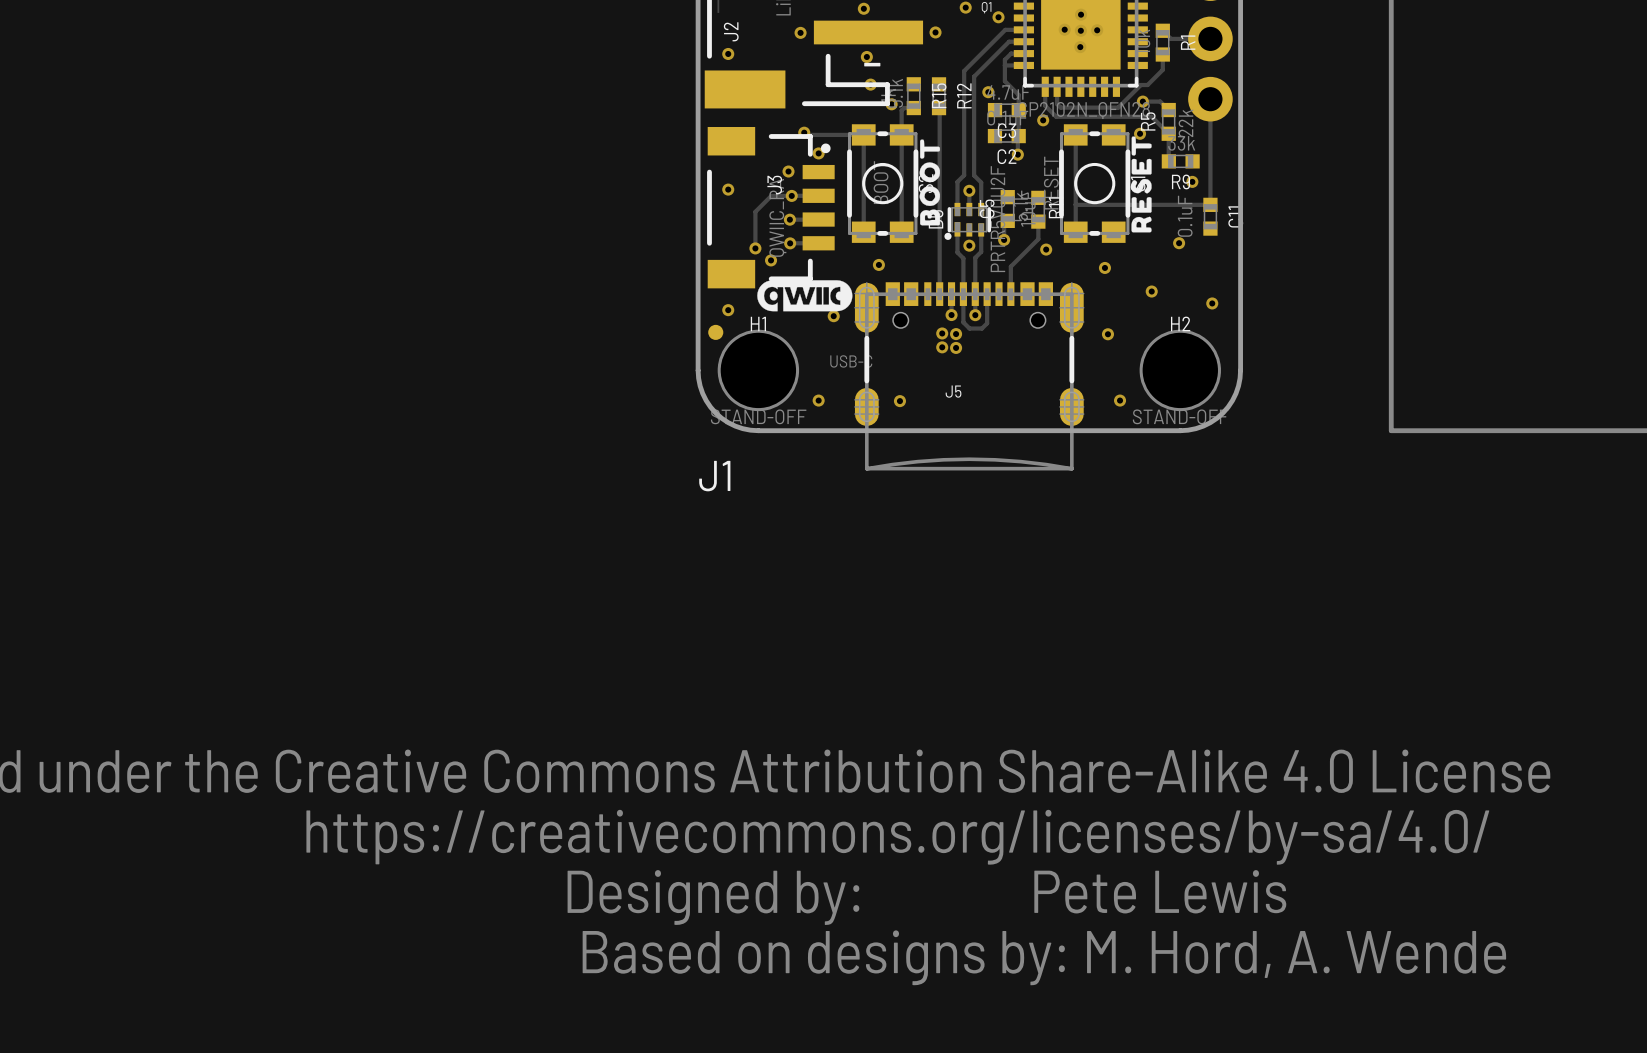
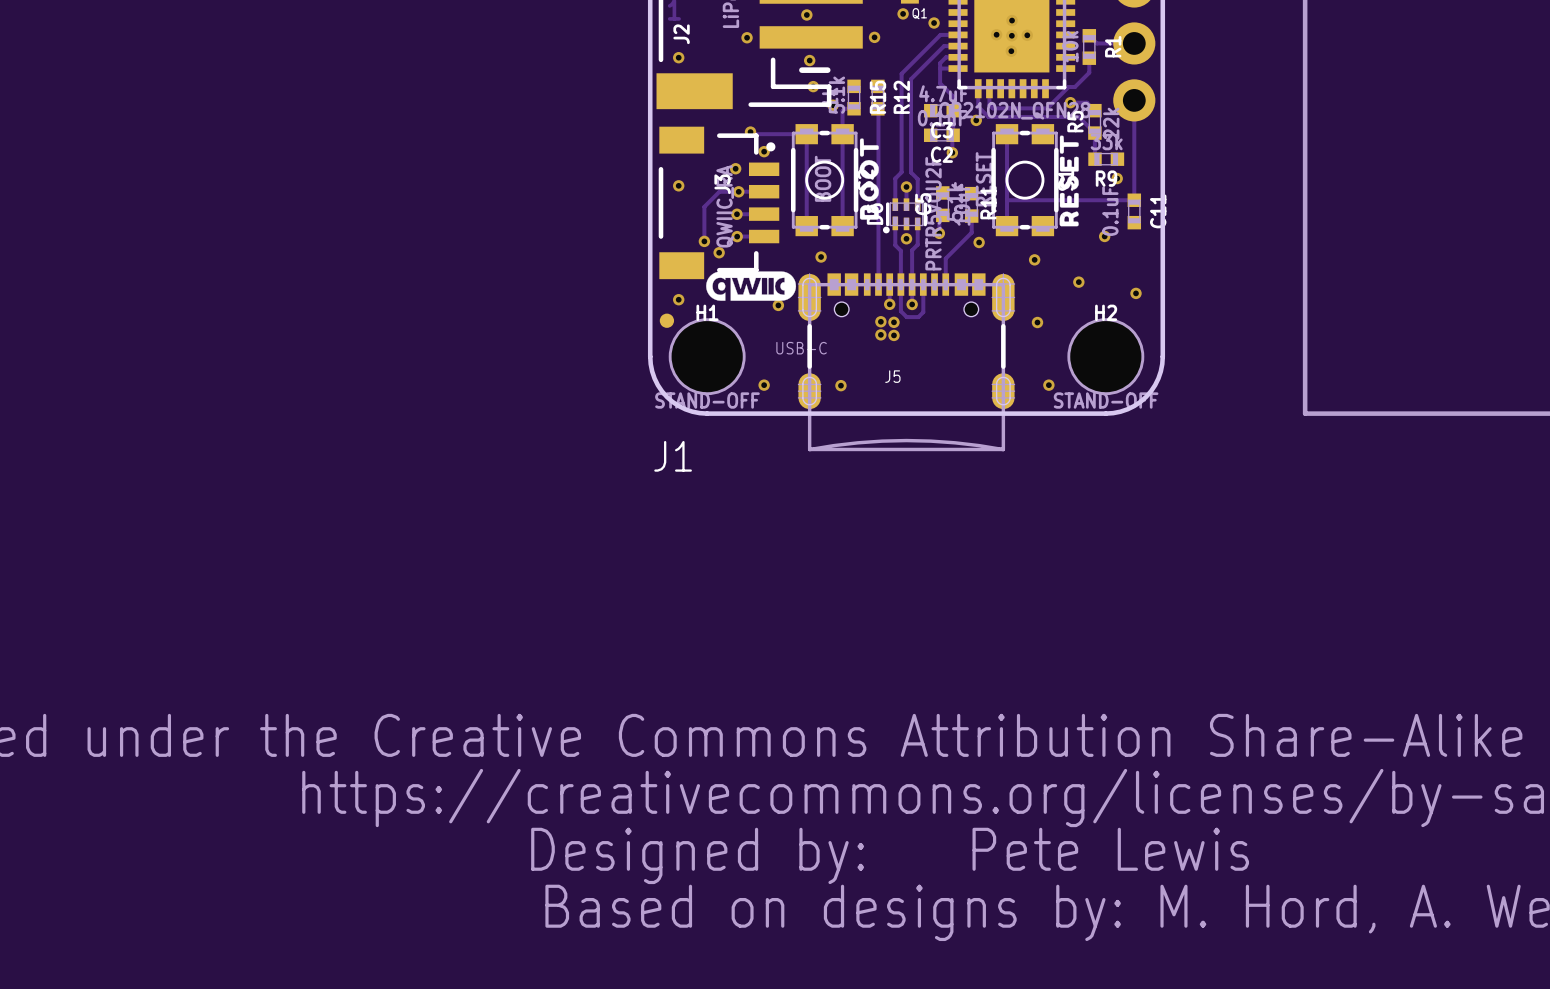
via: (988, 92) -> none
via: (1140, 133) -> none

